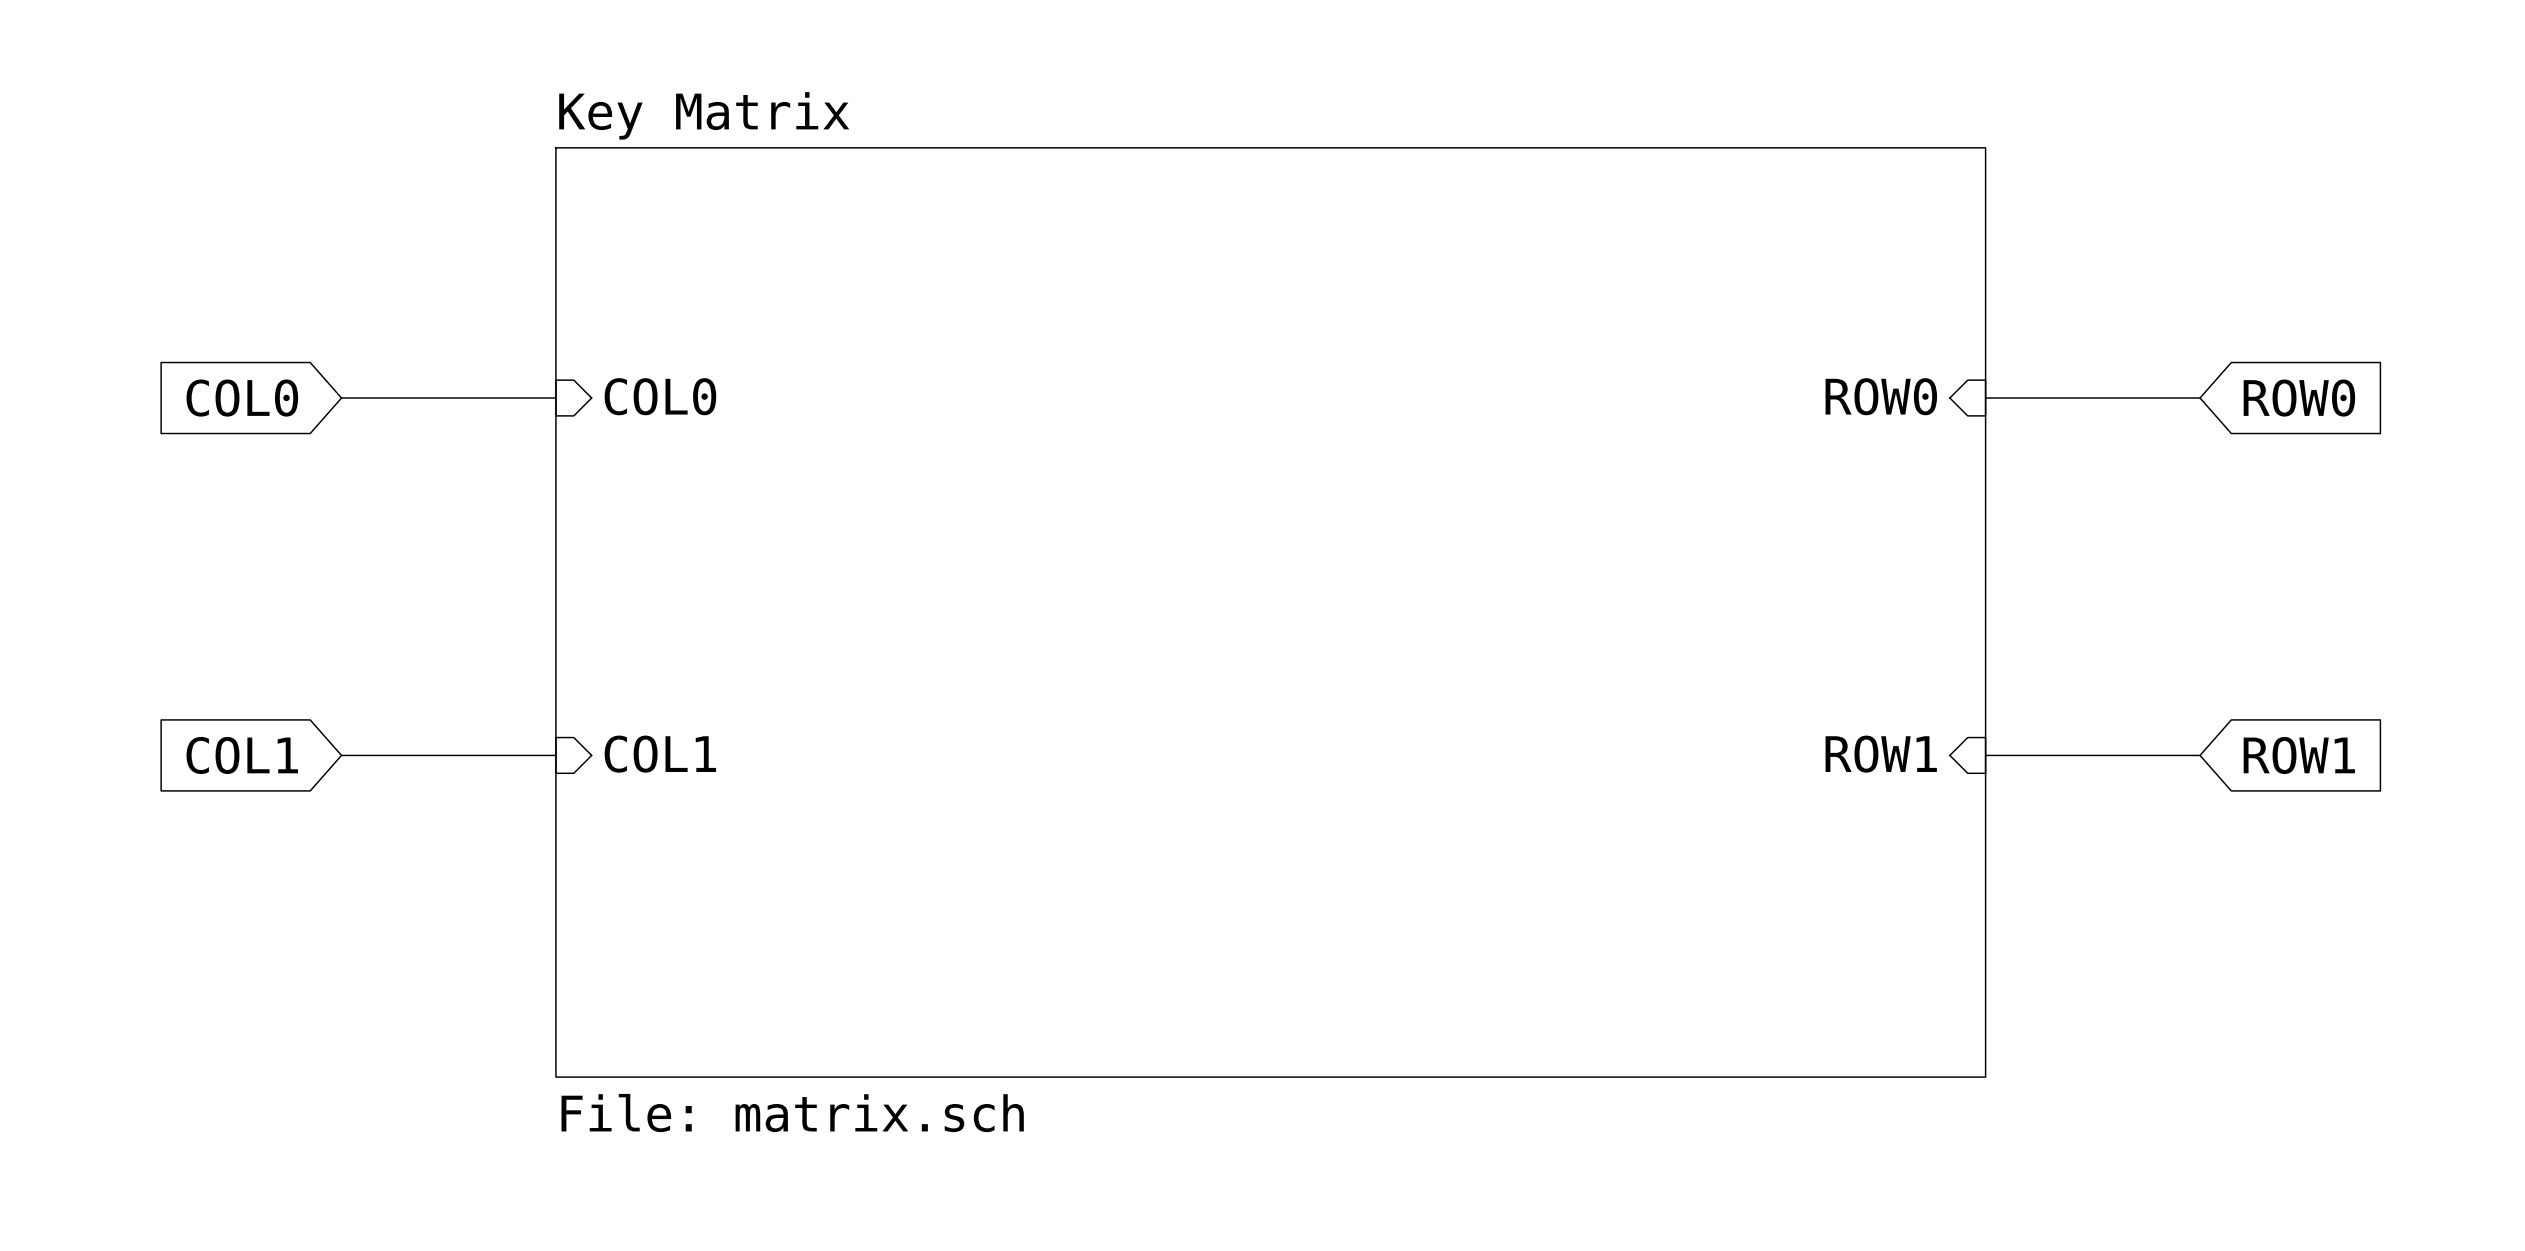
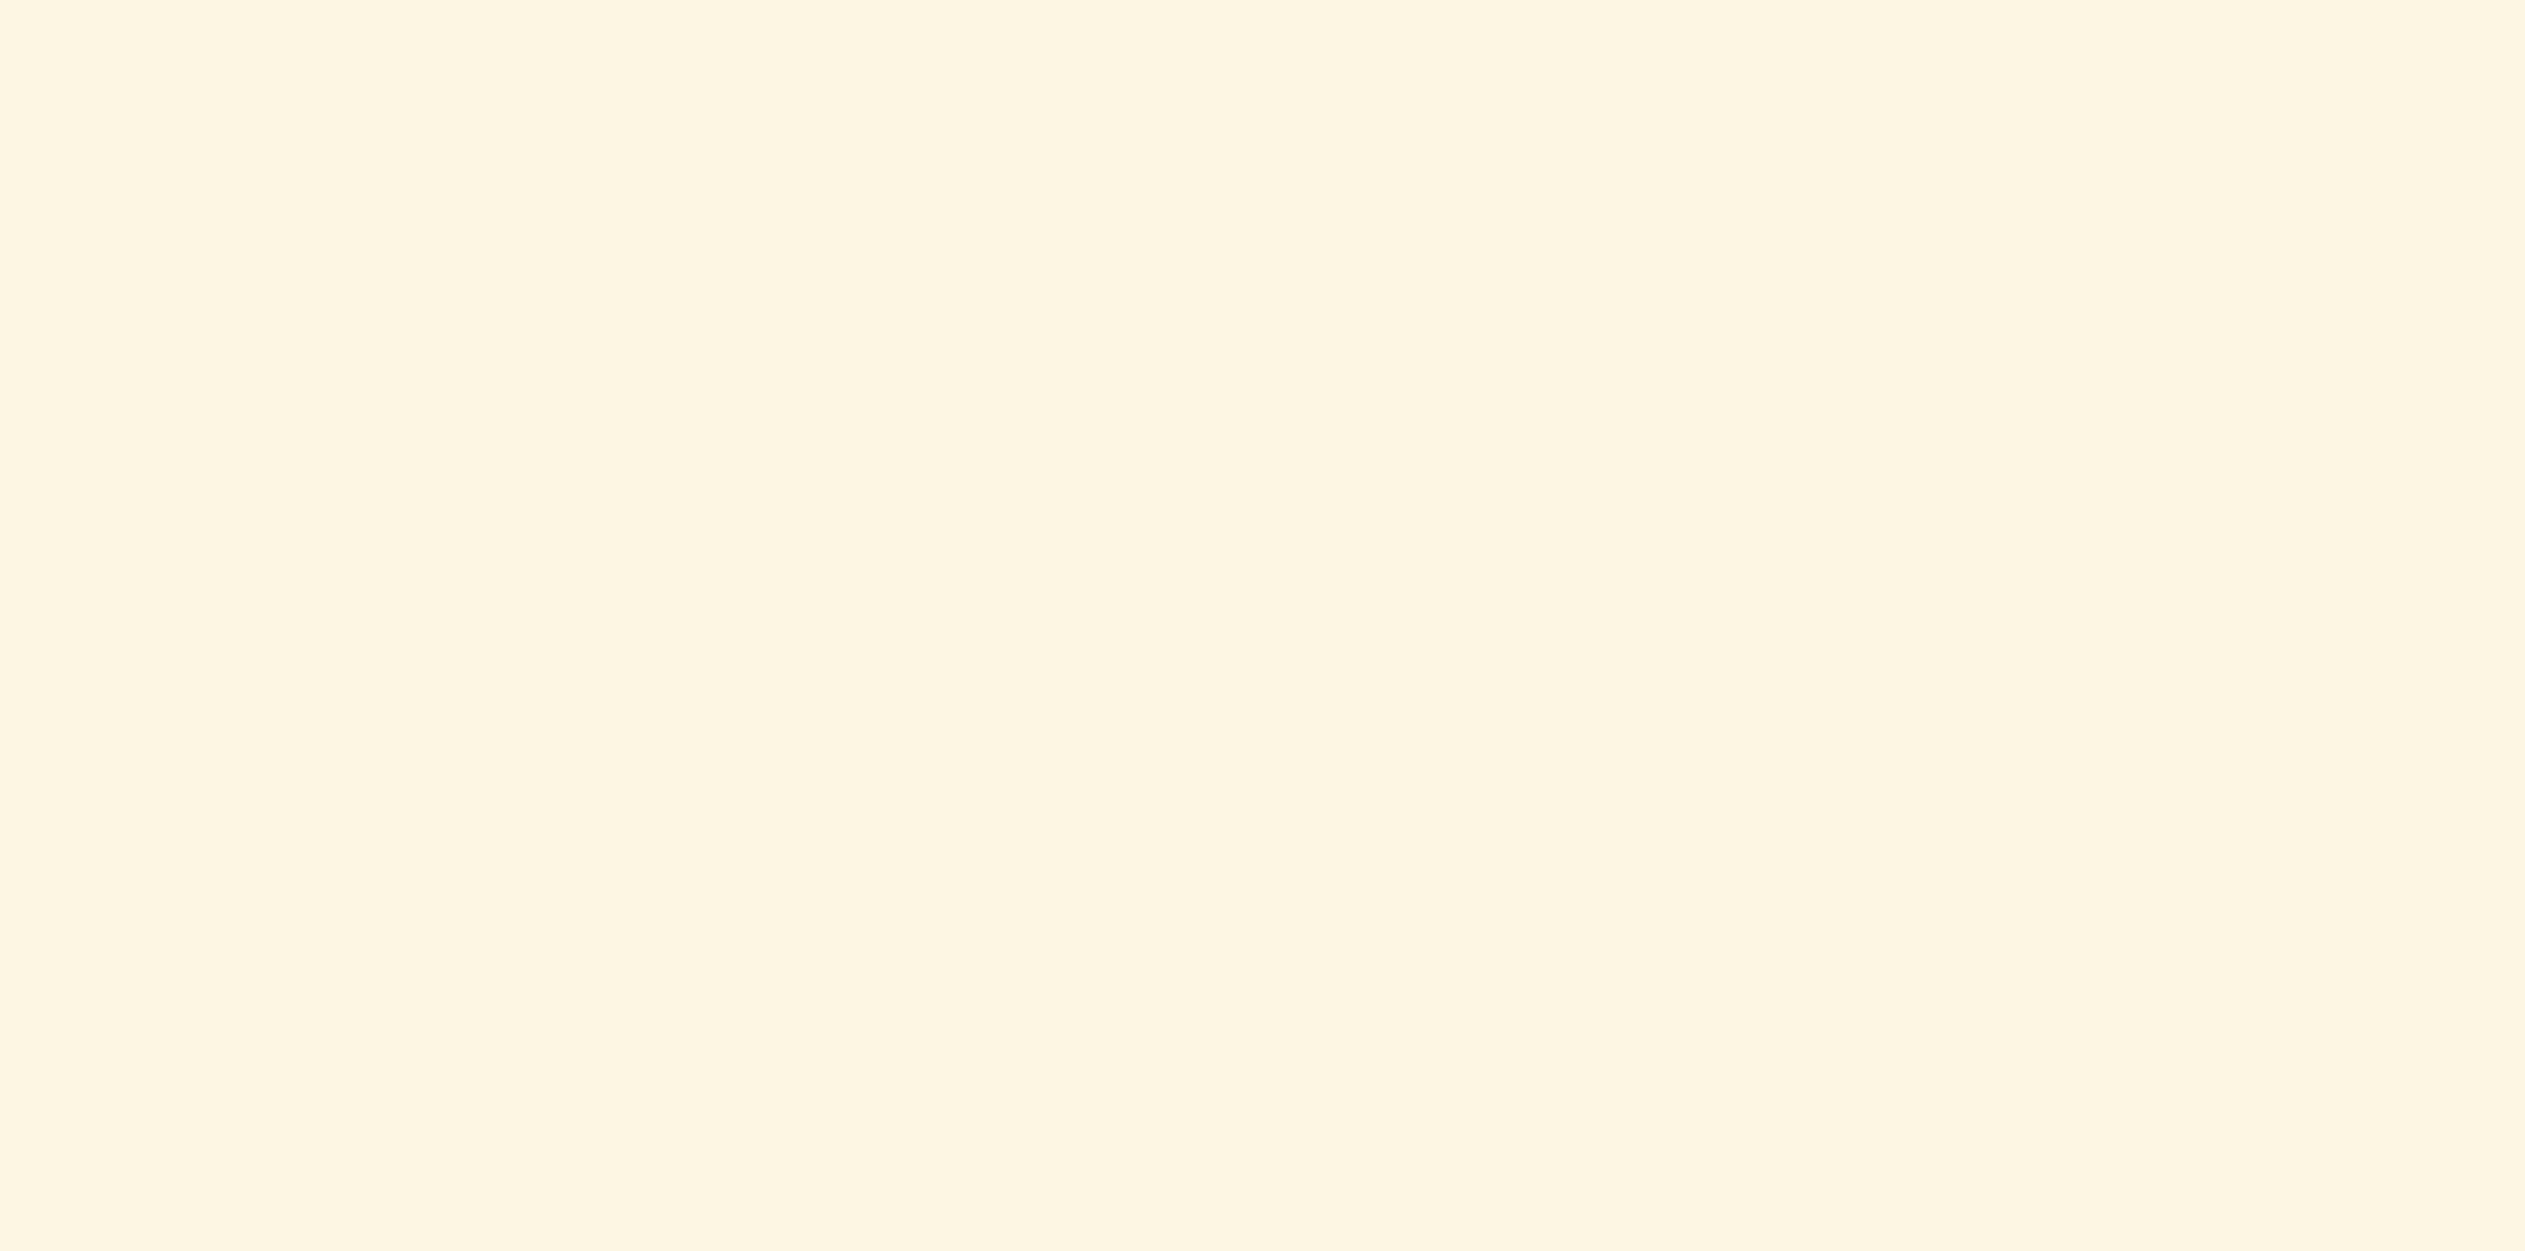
sheet pin: COL0 (660, 396) -> none
sheet pin: ROW0 (1881, 396) -> none
global label: COL0 (242, 398) -> none
wire: (341, 398) (555, 398) -> none
wire: (1985, 398) (2200, 398) -> none
global label: ROW0 (2299, 398) -> none
sheet Key Matrix: File: matrix.sch (1270, 612) -> none
sheet pin: COL1 (660, 754) -> none
sheet pin: ROW1 (1881, 754) -> none
global label: COL1 (242, 755) -> none
wire: (341, 755) (555, 755) -> none
wire: (1985, 755) (2200, 755) -> none
global label: ROW1 (2299, 755) -> none

